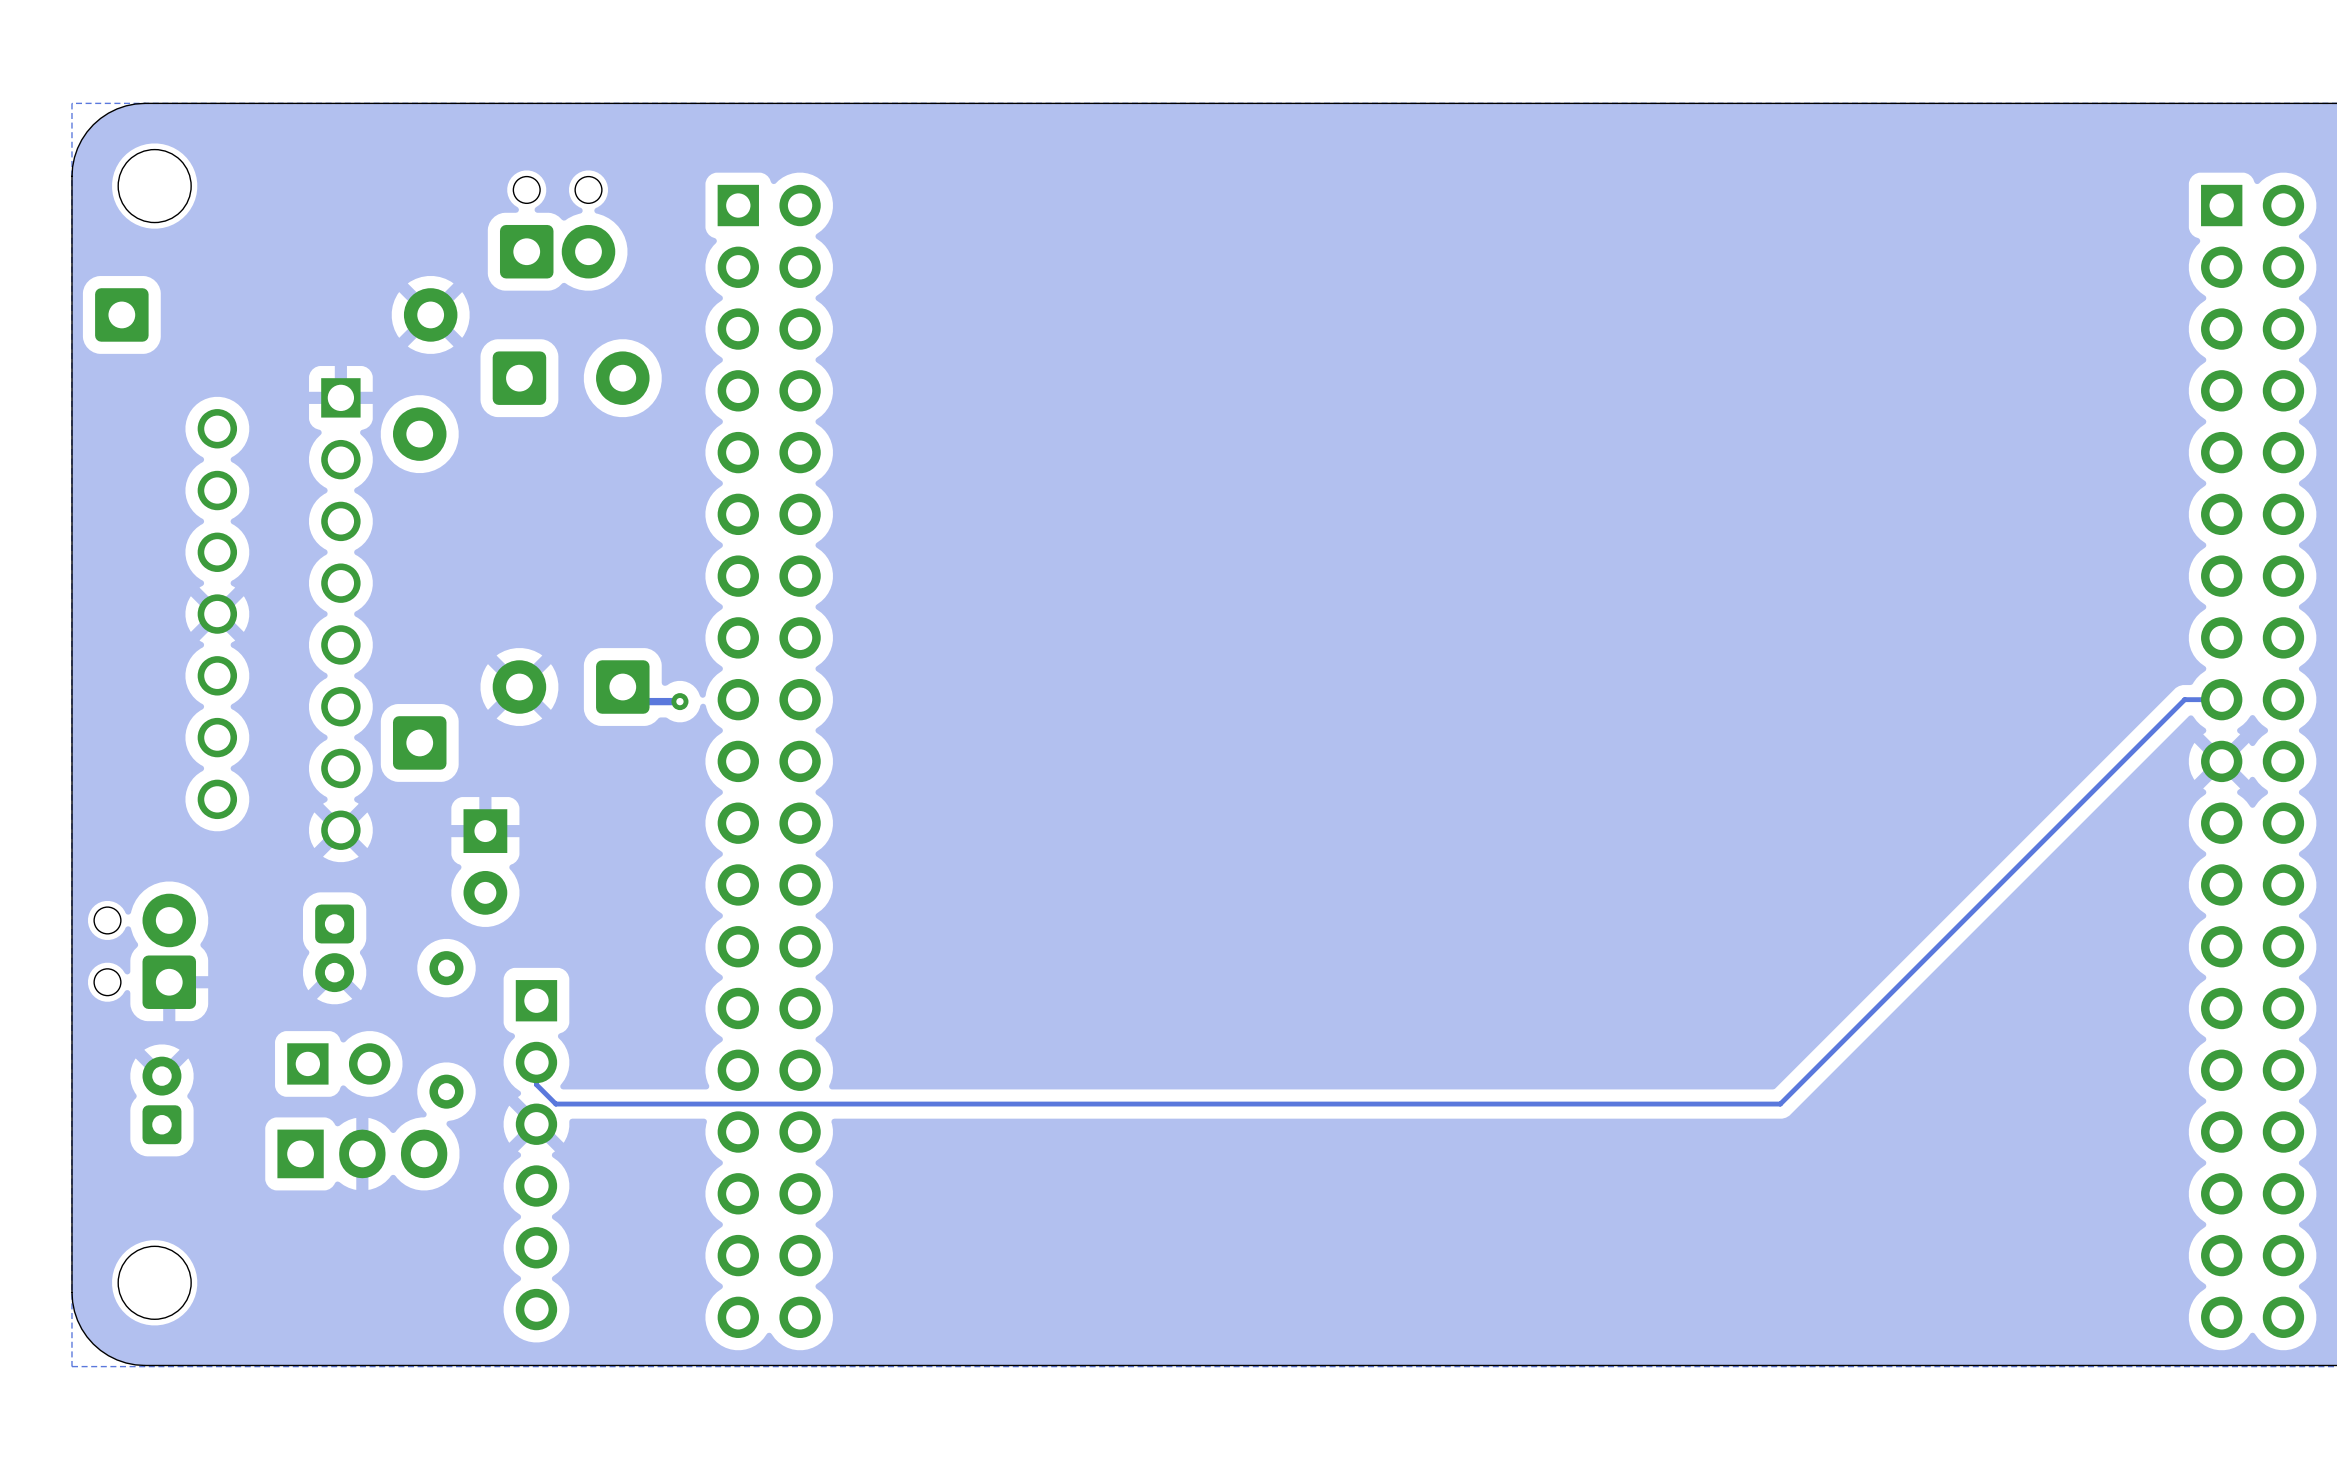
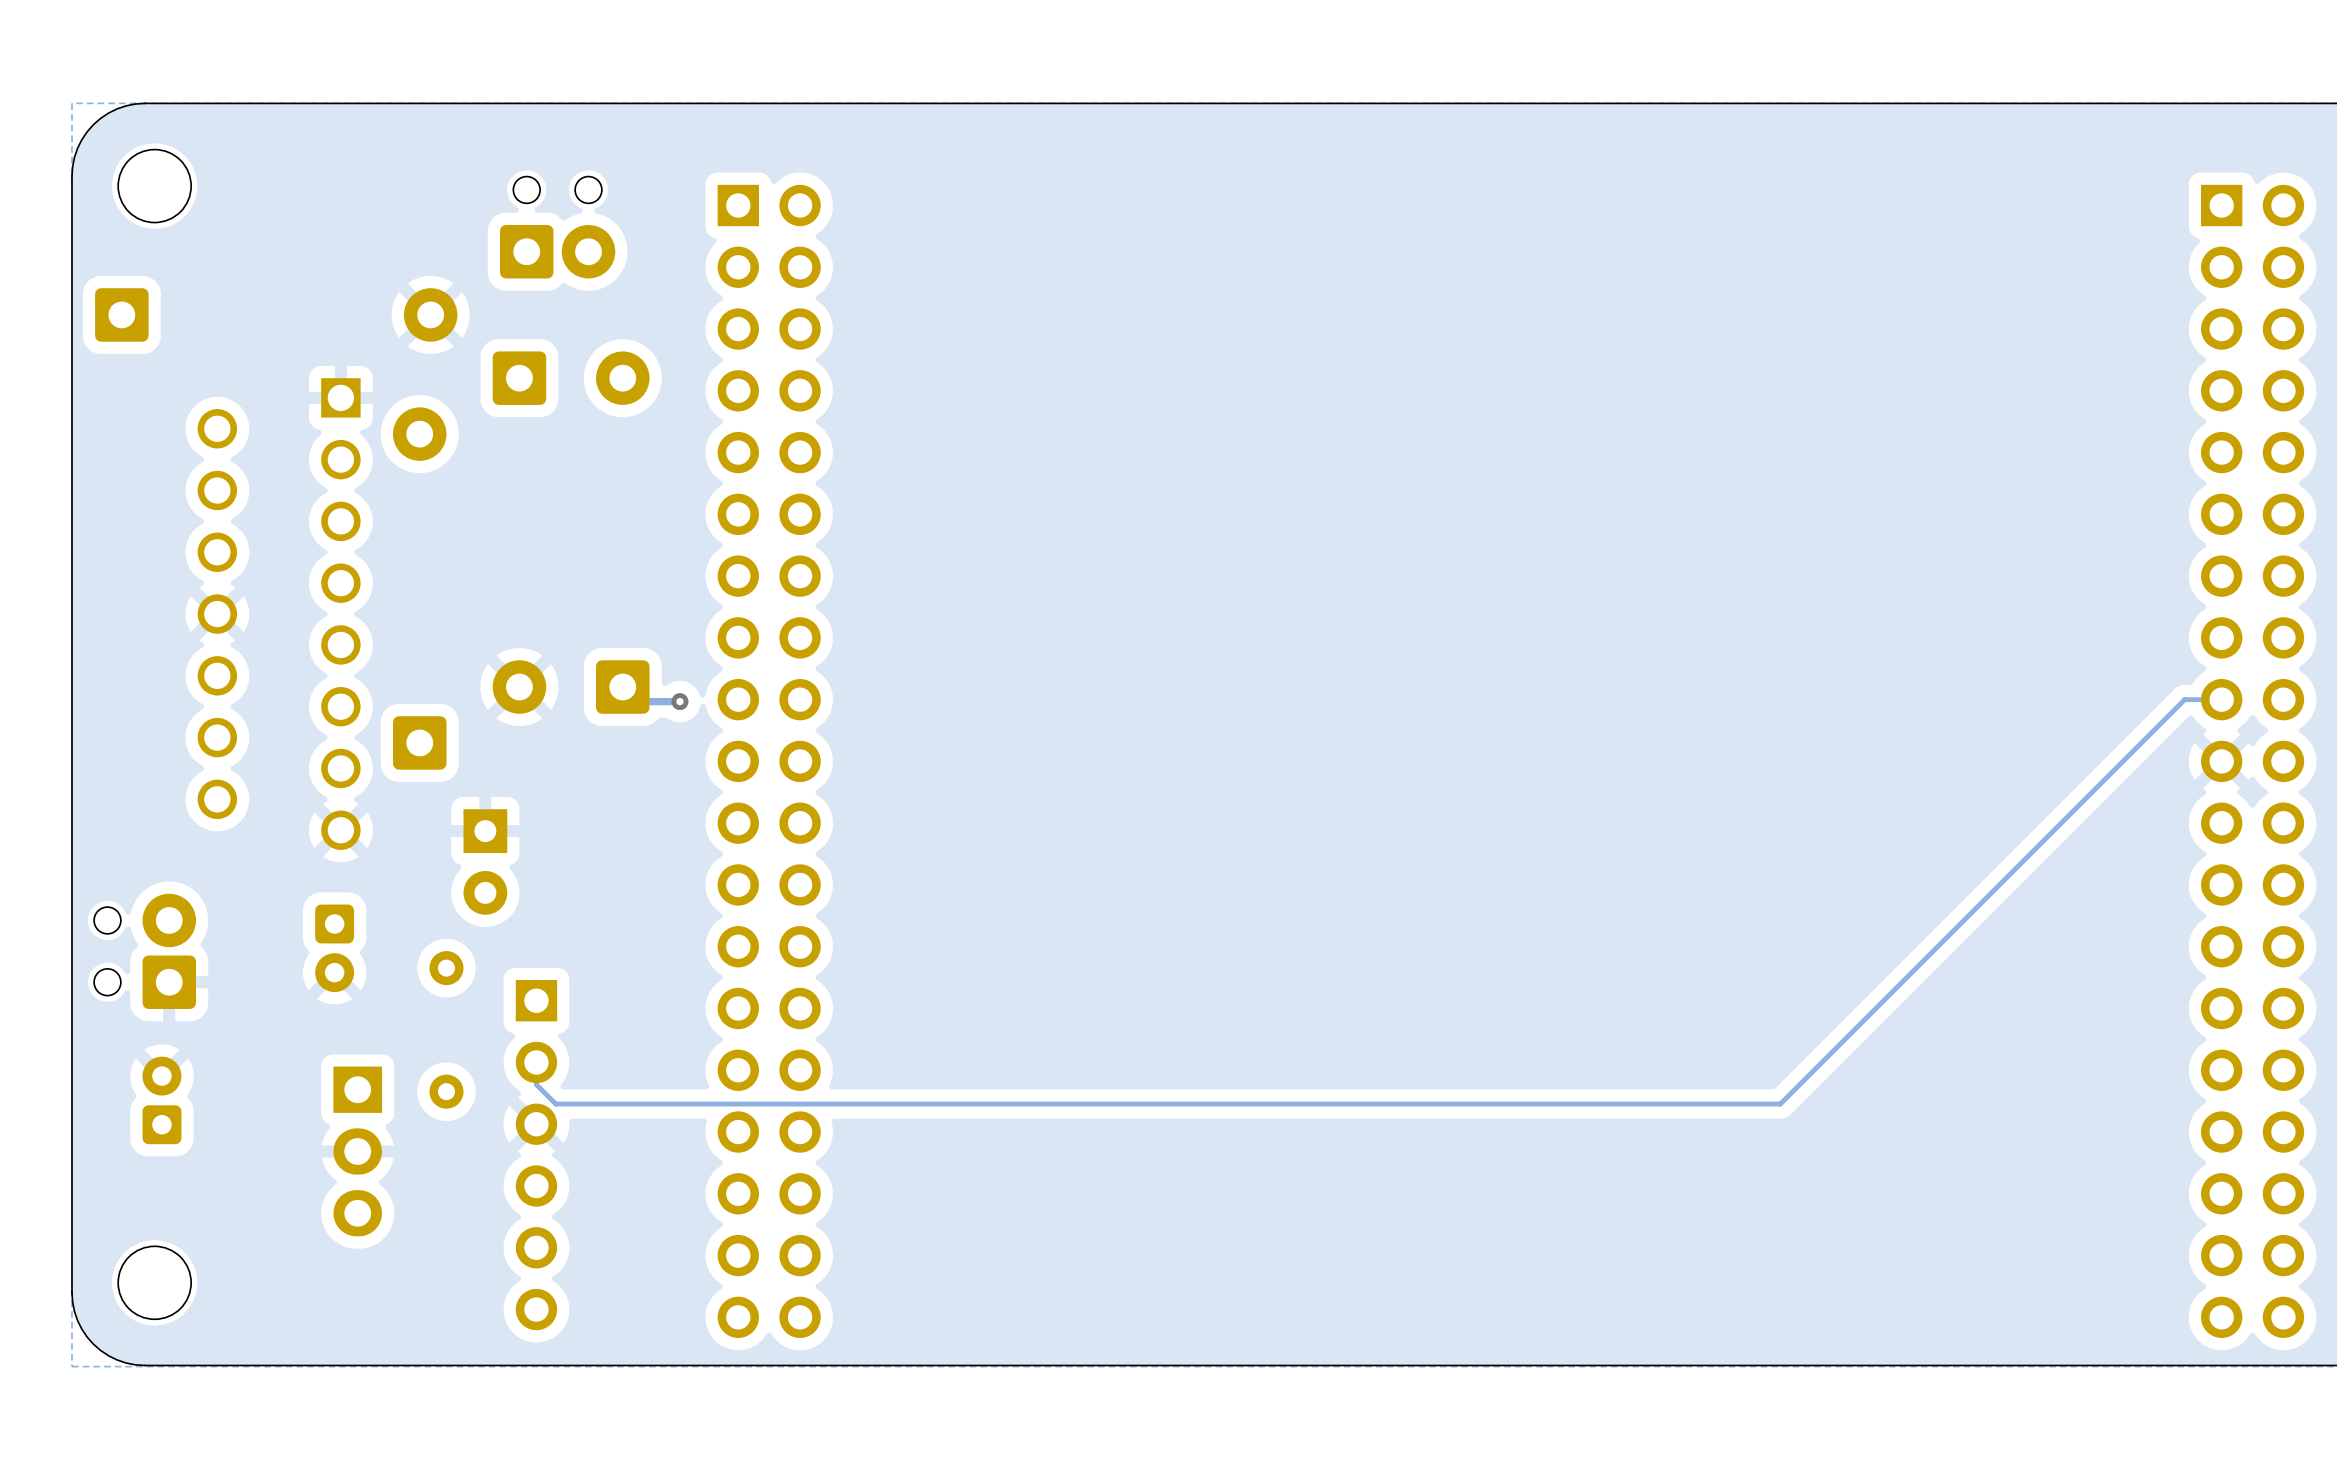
part: (338, 1063) -> none
part rotation: 0° (362, 1153) -> 90° clockwise (357, 1151)

